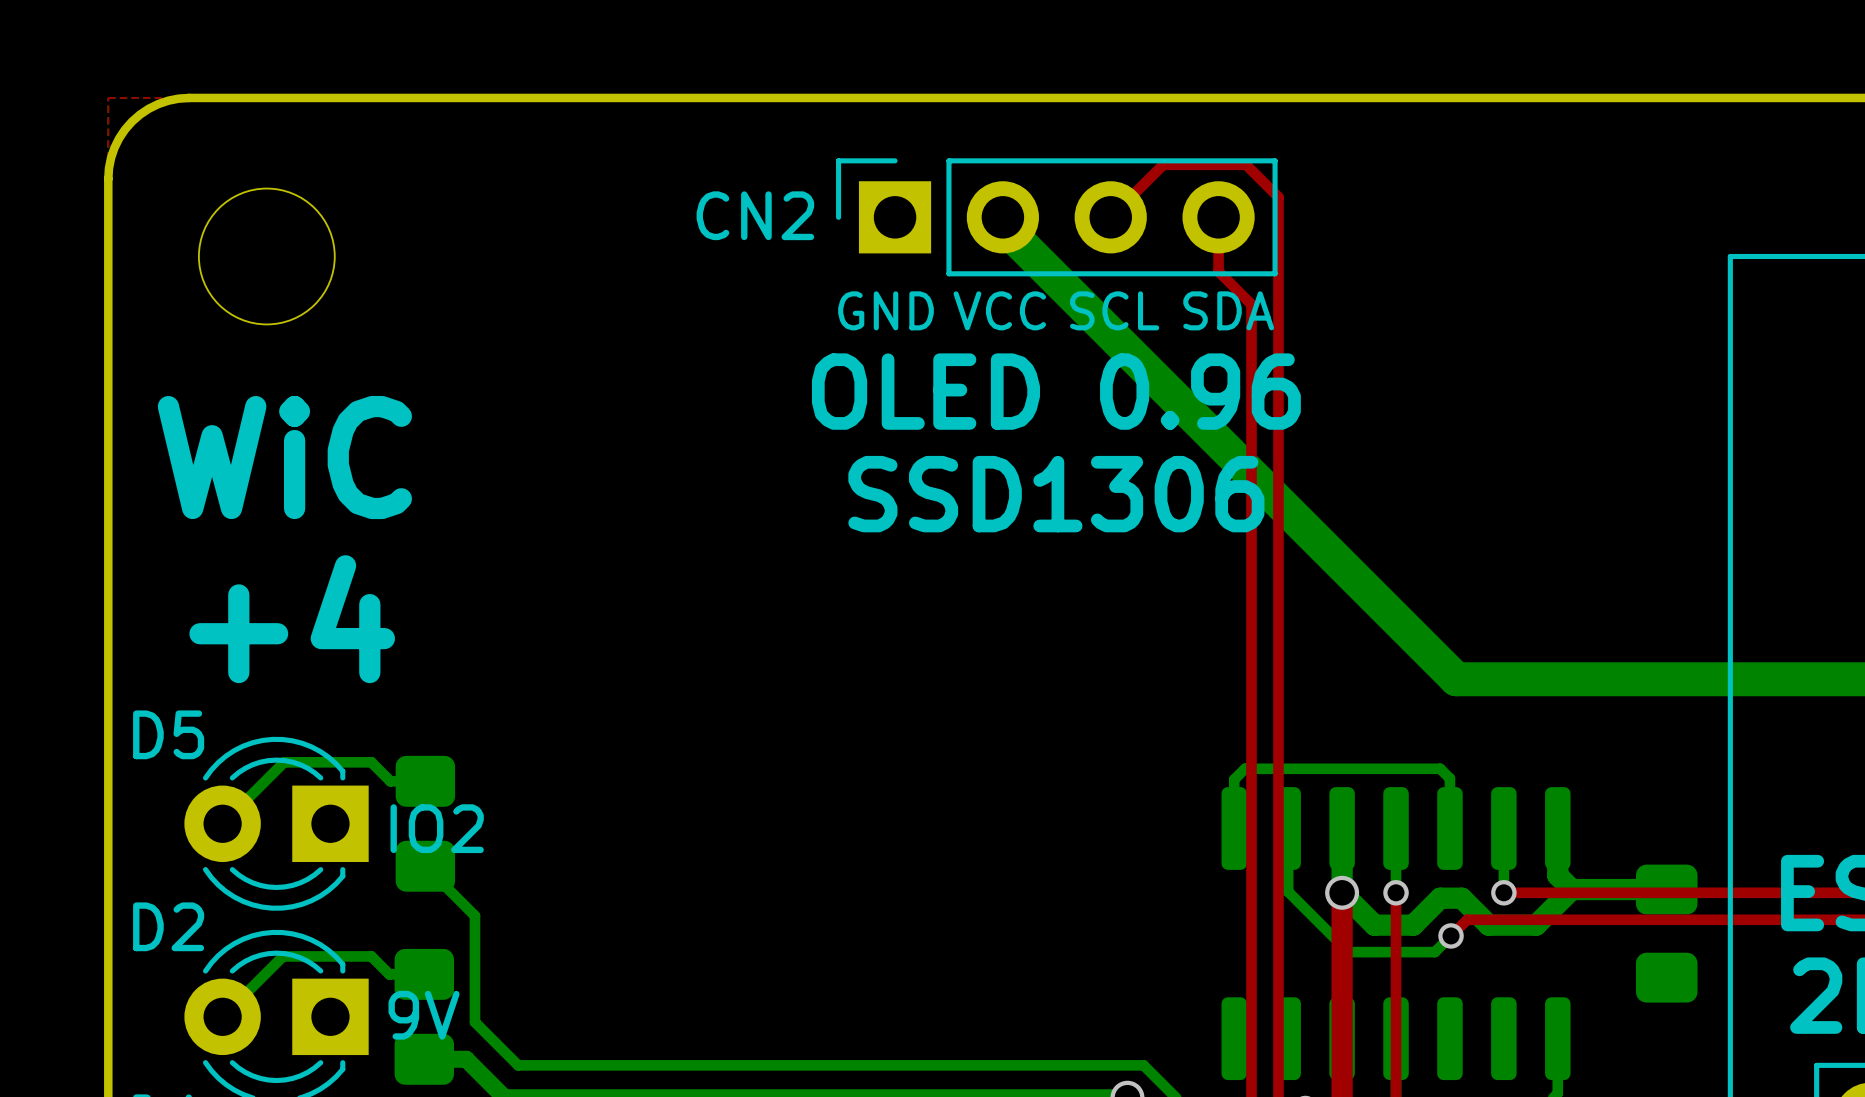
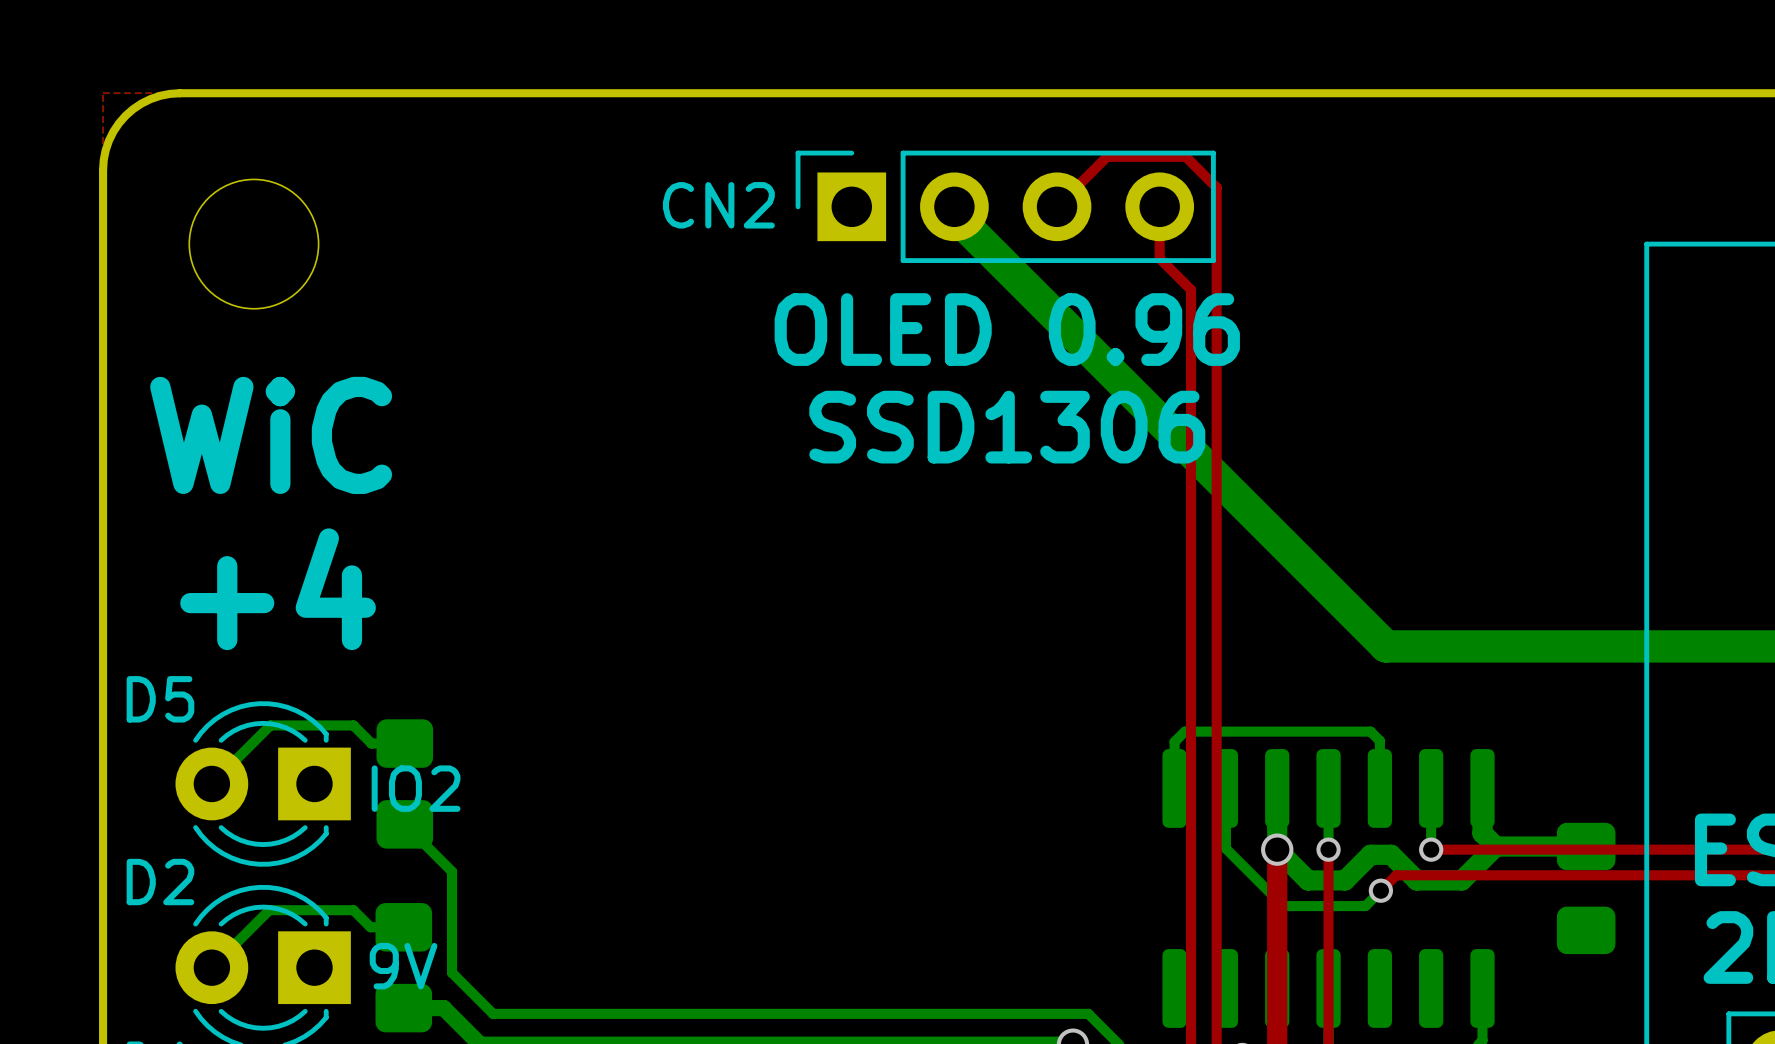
text: GND (886, 310) -> none
text: VCC (999, 310) -> none
text: SCL (1114, 310) -> OLED 0.96 (1007, 329)
text: SDA (1228, 310) -> none
text: OLED 0.96 (1056, 391) -> none
text position: SSD1306 (1056, 494) -> SSD1306 (1007, 427)

